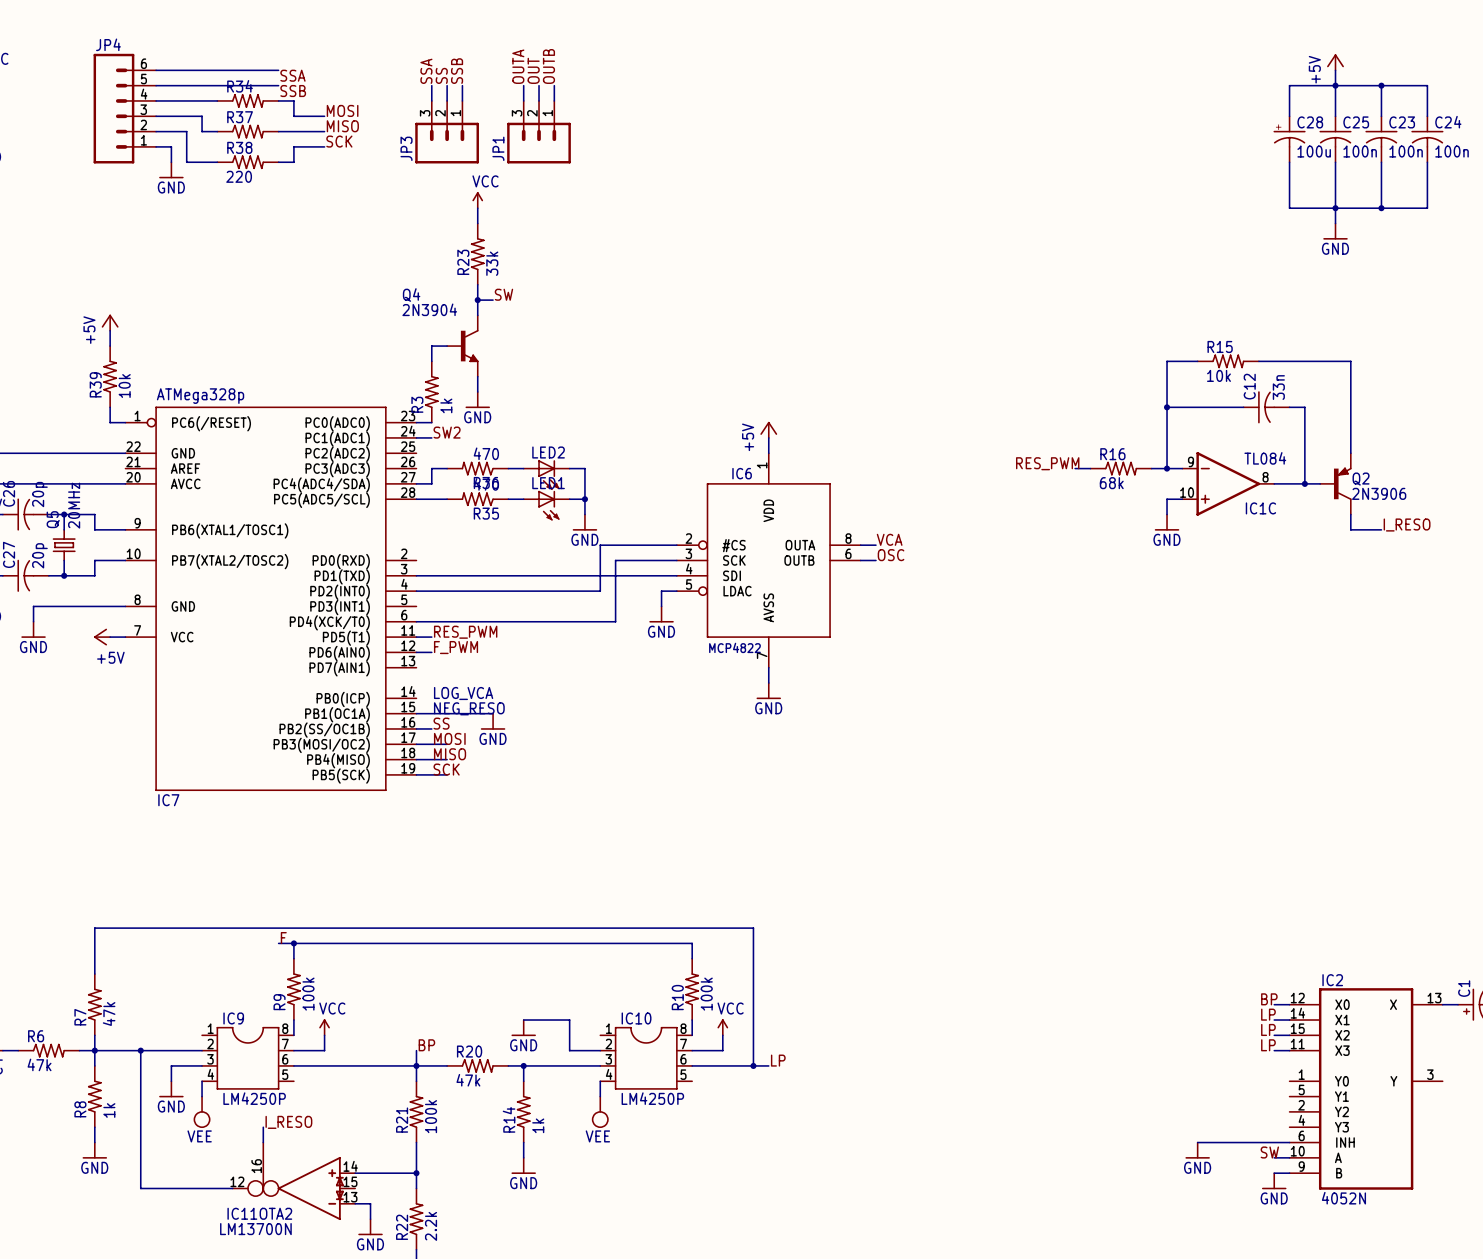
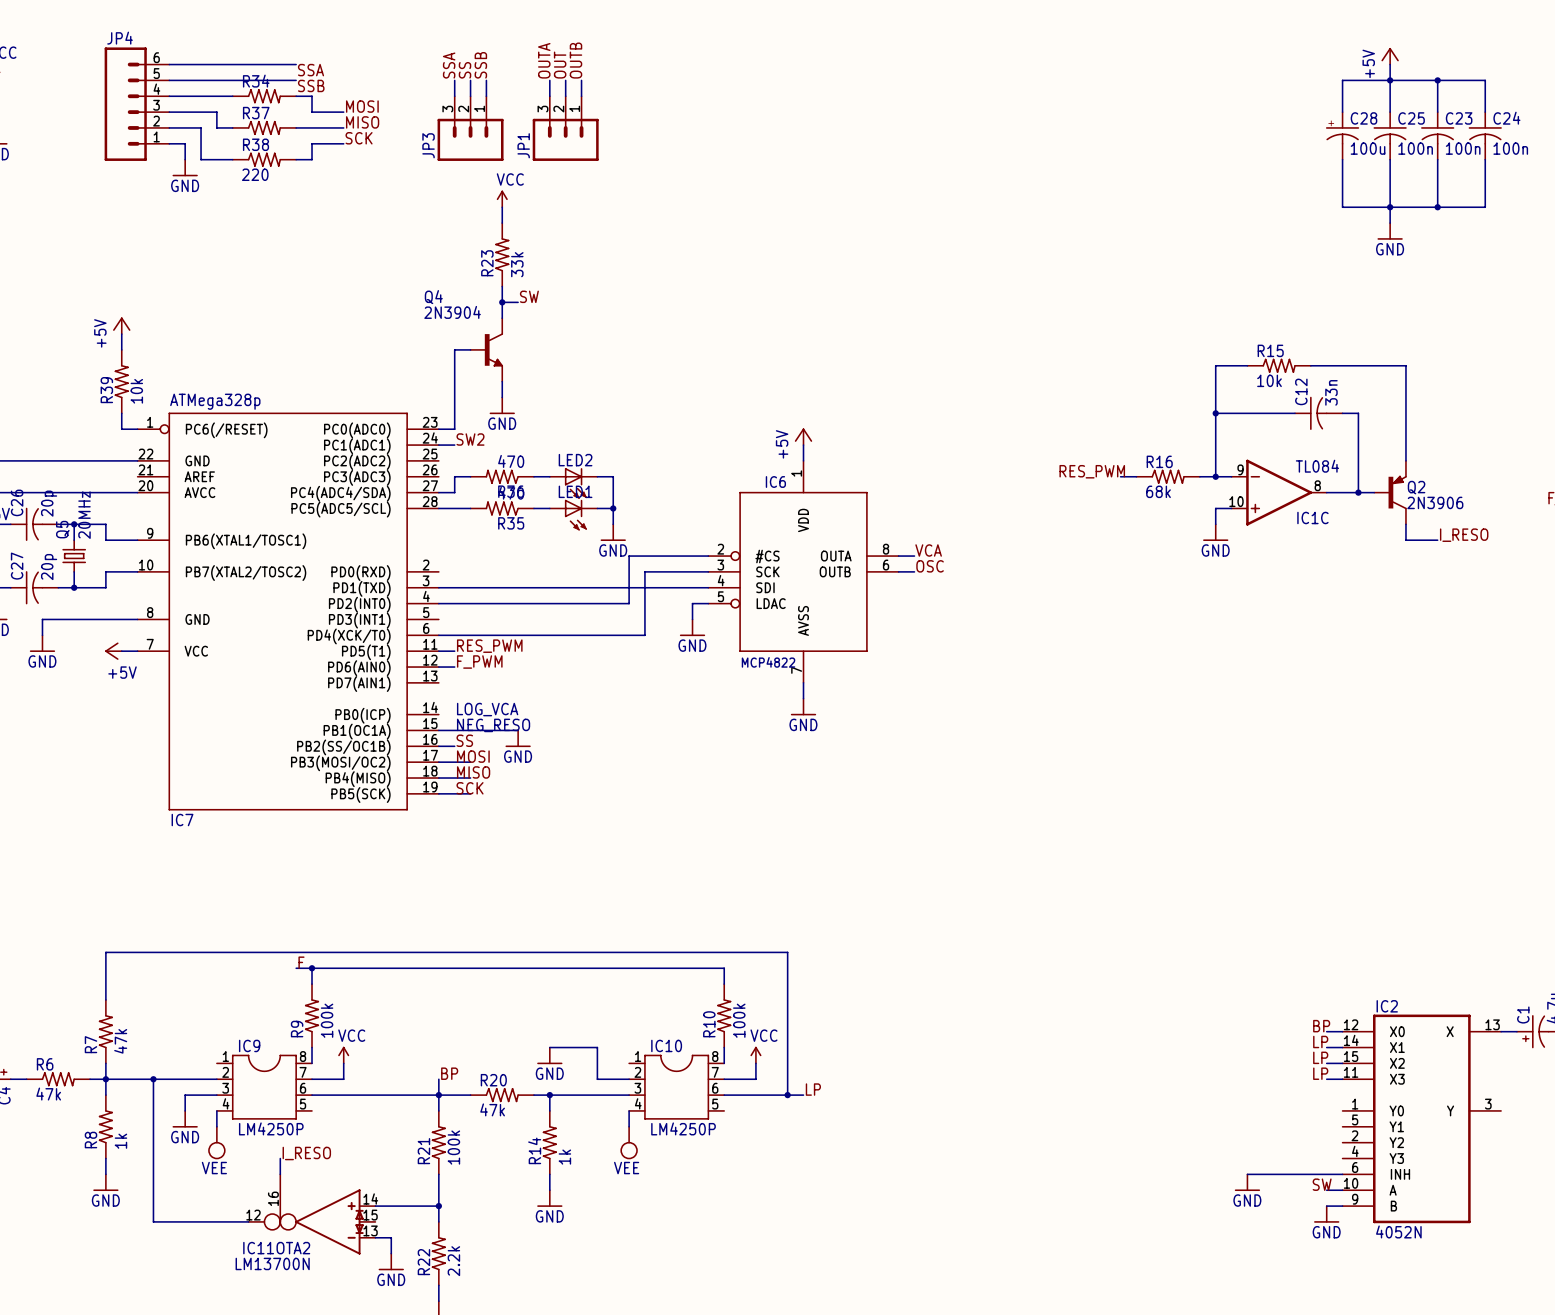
R3: 1k (431, 392) -> none

